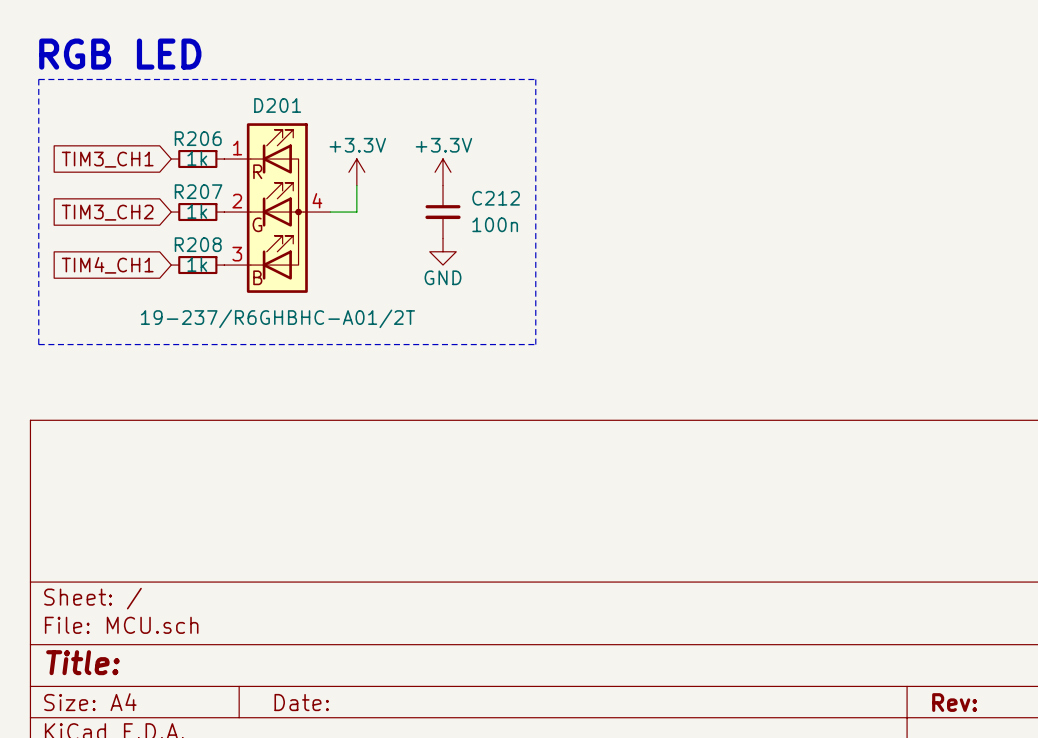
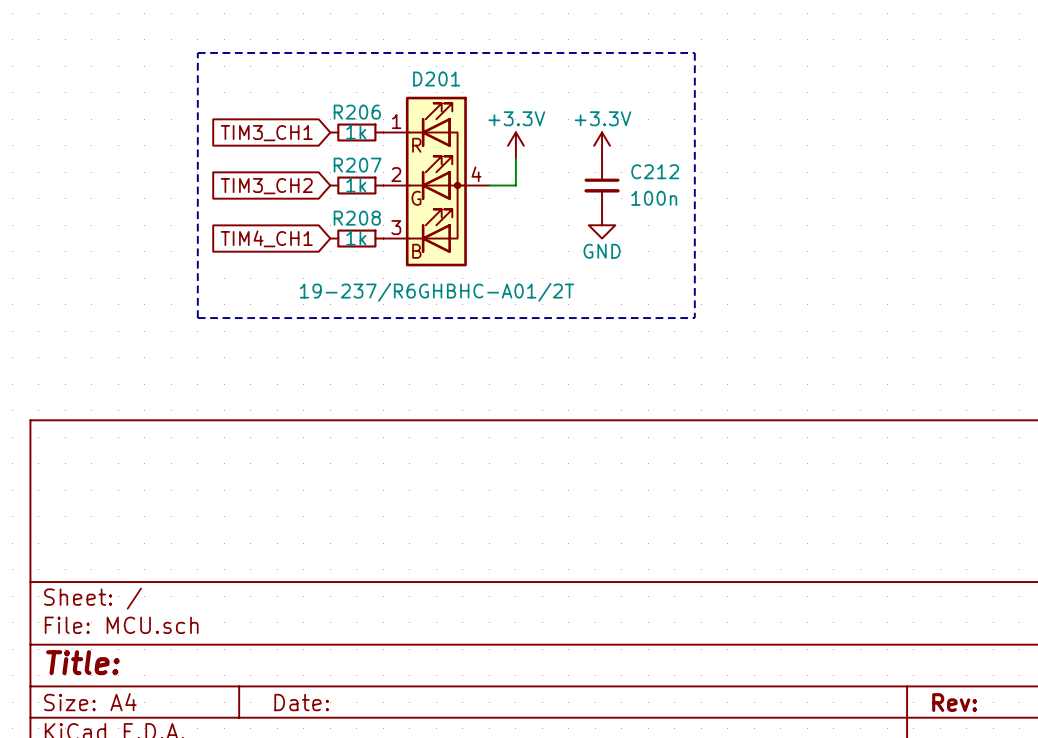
text: RGB LED (120, 54) -> none
line: (38, 79) (38, 344) (535, 344) (535, 79) (38, 79) -> (197, 52) (197, 318) (694, 318) (694, 52) (197, 52)
power symbol: none -> +3.3V (602, 145)
global label position: TIM3_CH1 (107, 159) -> TIM3_CH1 (266, 133)
R206 position: (197, 159) -> (356, 132)
power symbol: +3.3V (356, 172) -> none
power symbol position: +3.3V (443, 172) -> +3.3V (515, 145)
wire: (356, 185) (356, 212) (330, 212) -> (515, 159) (515, 185) (489, 185)
D201 position: (277, 208) -> (436, 181)
global label position: TIM3_CH2 (107, 212) -> TIM3_CH2 (266, 186)
R207 position: (197, 212) -> (356, 185)
C212 position: (443, 212) -> (602, 185)
power symbol position: GND (443, 251) -> GND (602, 225)
global label position: TIM4_CH1 (107, 265) -> TIM4_CH1 (266, 238)
R208 position: (197, 265) -> (356, 238)

